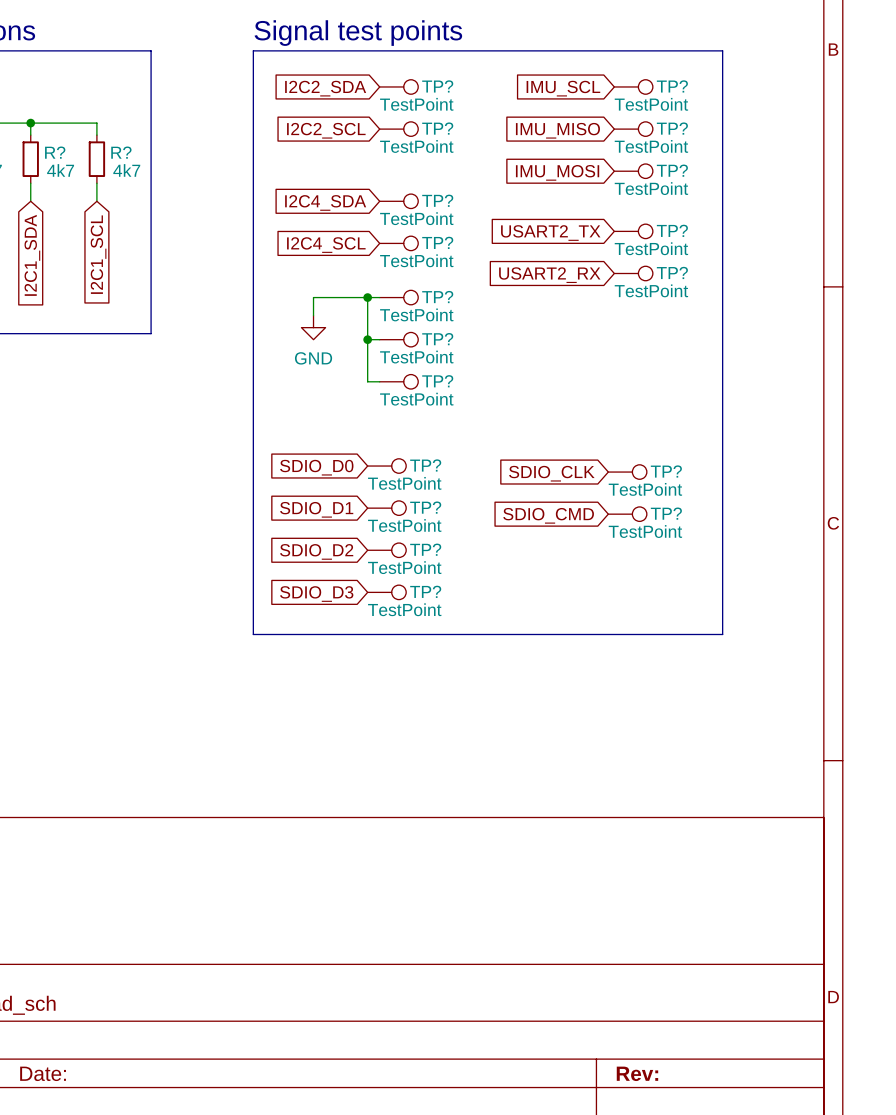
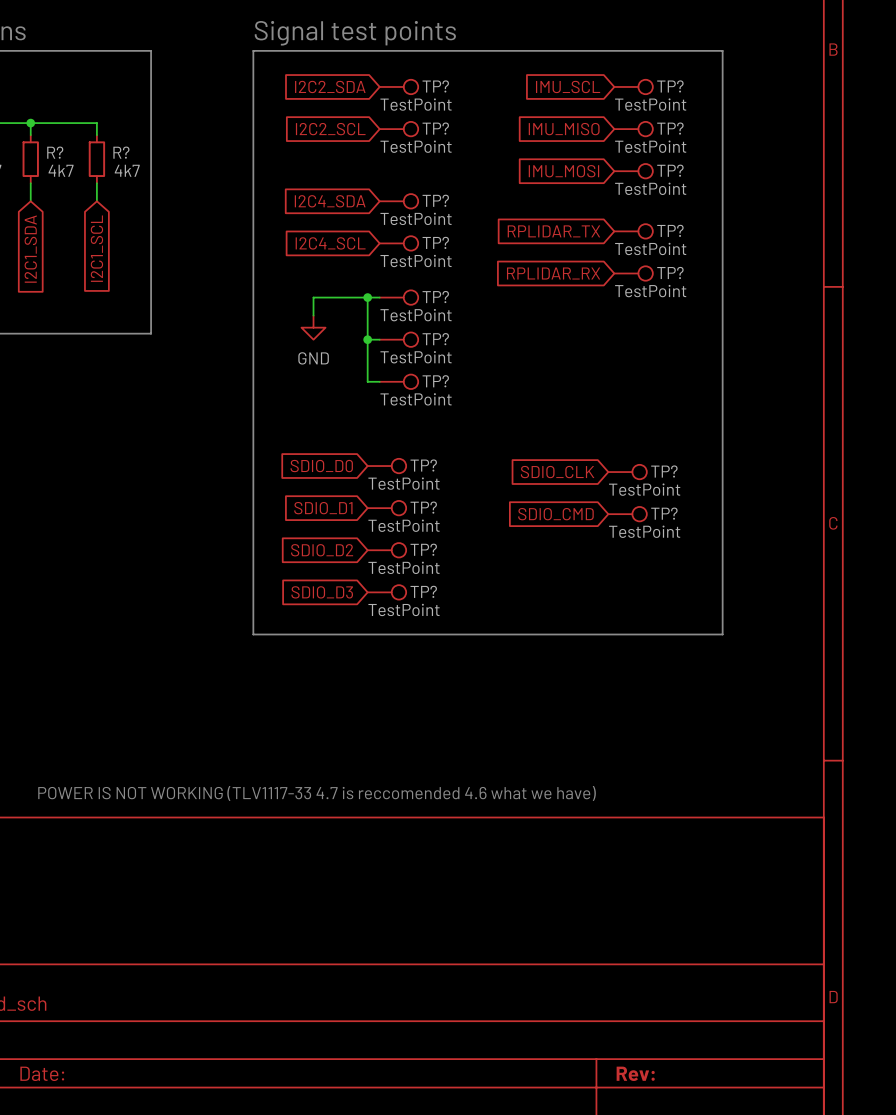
global label: USART2_TX (550, 233) -> RPLIDAR_TX (553, 231)
global label: USART2_RX (549, 275) -> RPLIDAR_RX (553, 273)
text: none -> POWER IS NOT WORKING (TLV1117-33 4.7 is reccomended 4.6 what we have) (317, 793)

